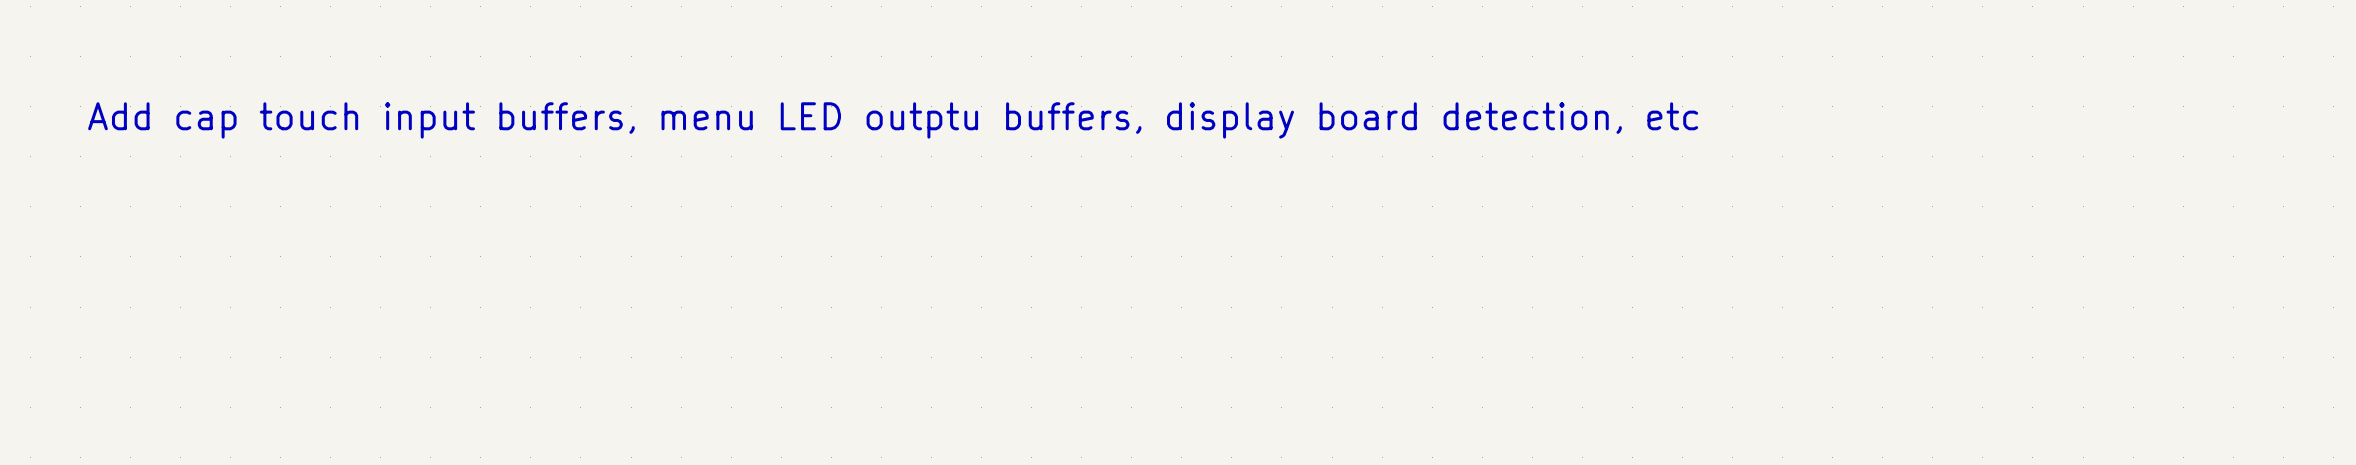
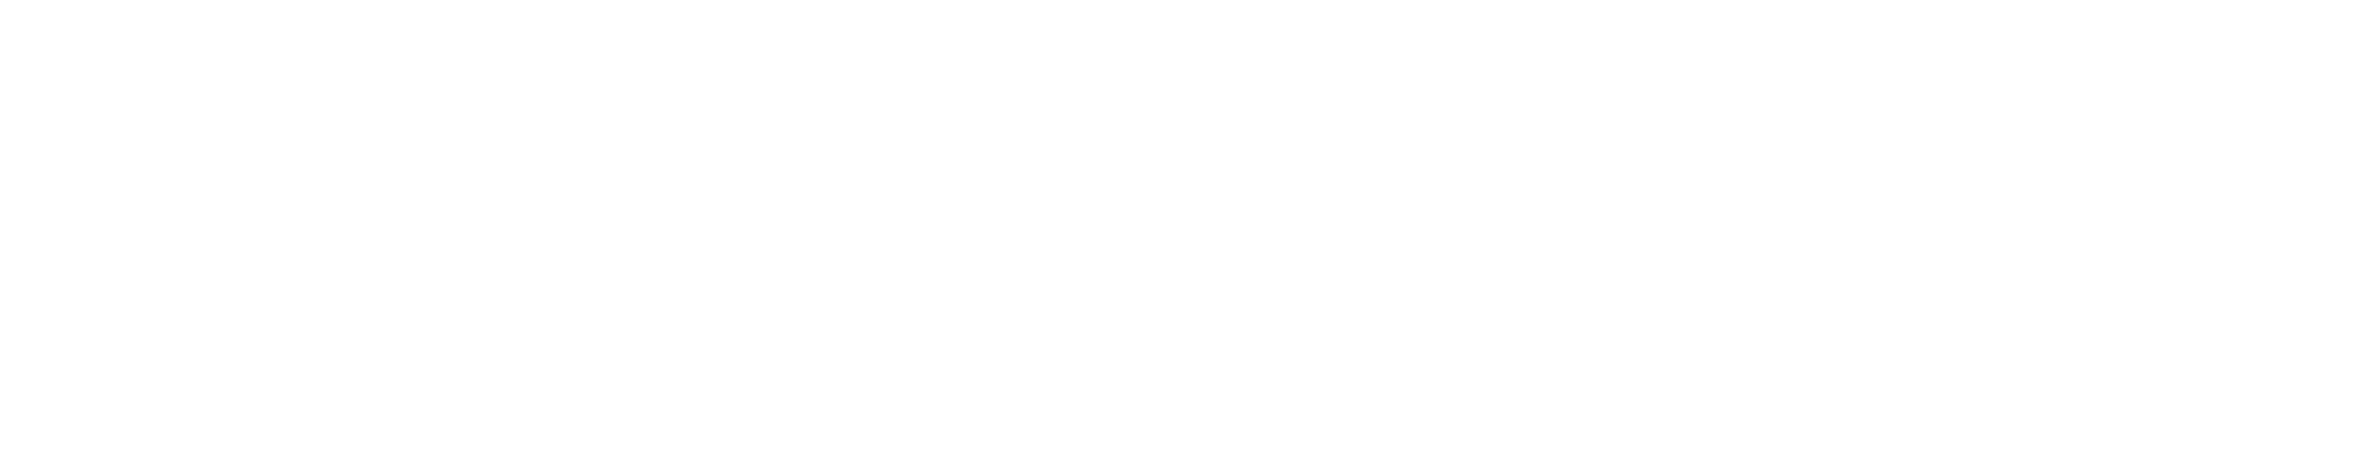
text: Add cap touch input buffers, menu LED outptu buffers, display board detection, etc (893, 120) -> none

